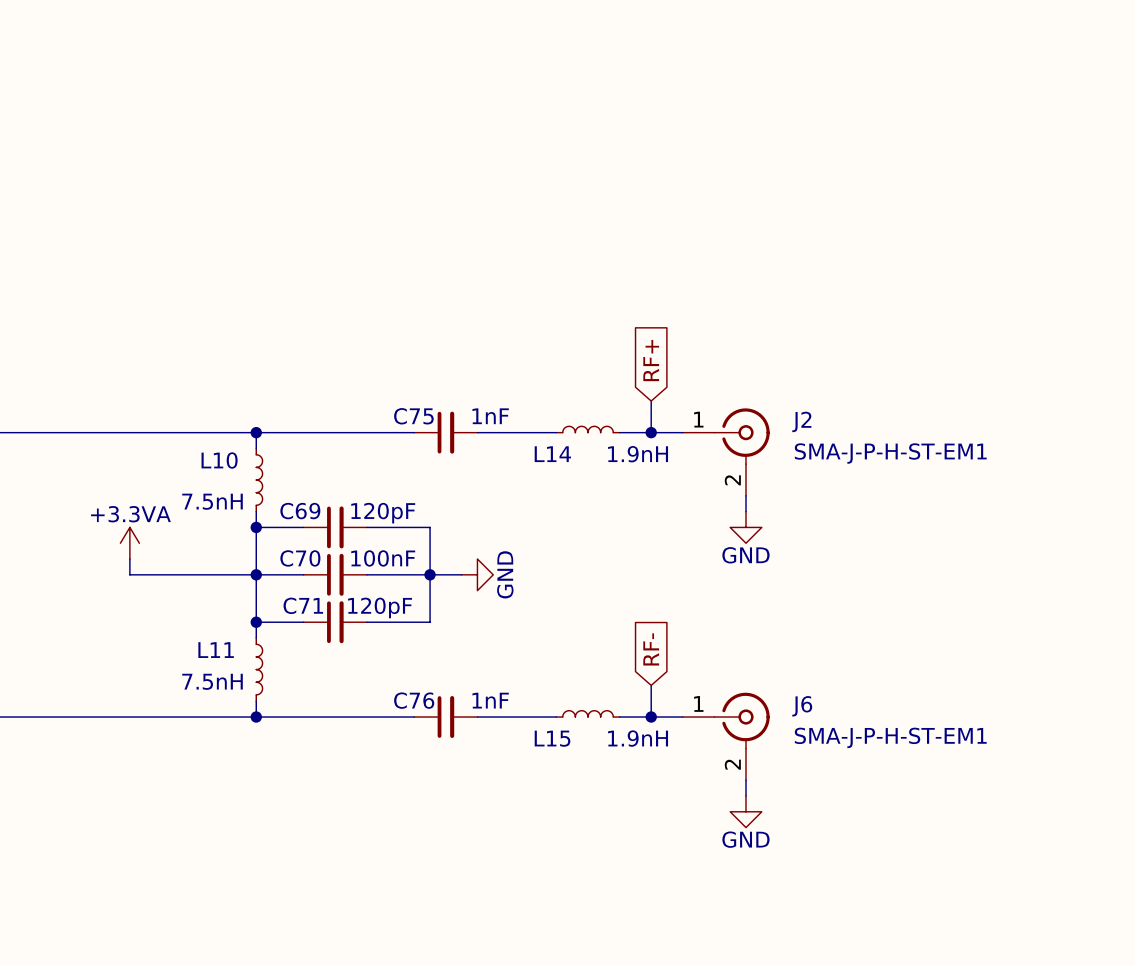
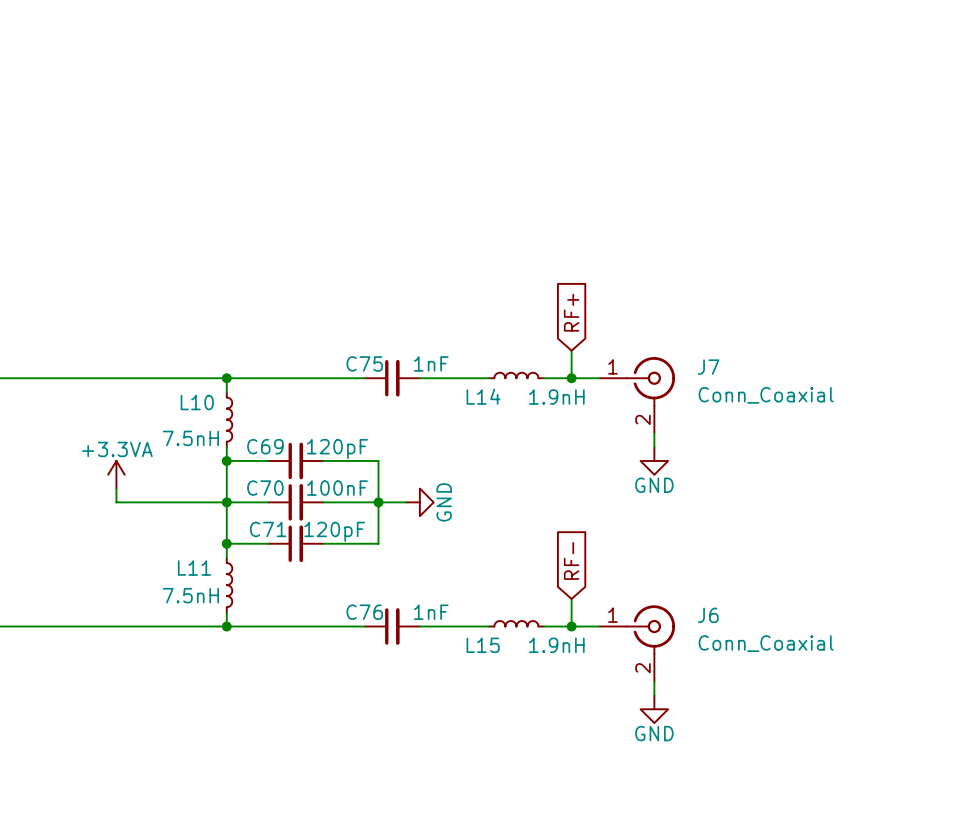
J2 name: J2 (801, 421) -> J7 (708, 367)
J2 value: SMA-J-P-H-ST-EM1 (890, 453) -> Conn_Coaxial (766, 395)
J6 value: SMA-J-P-H-ST-EM1 (890, 737) -> Conn_Coaxial (766, 643)

